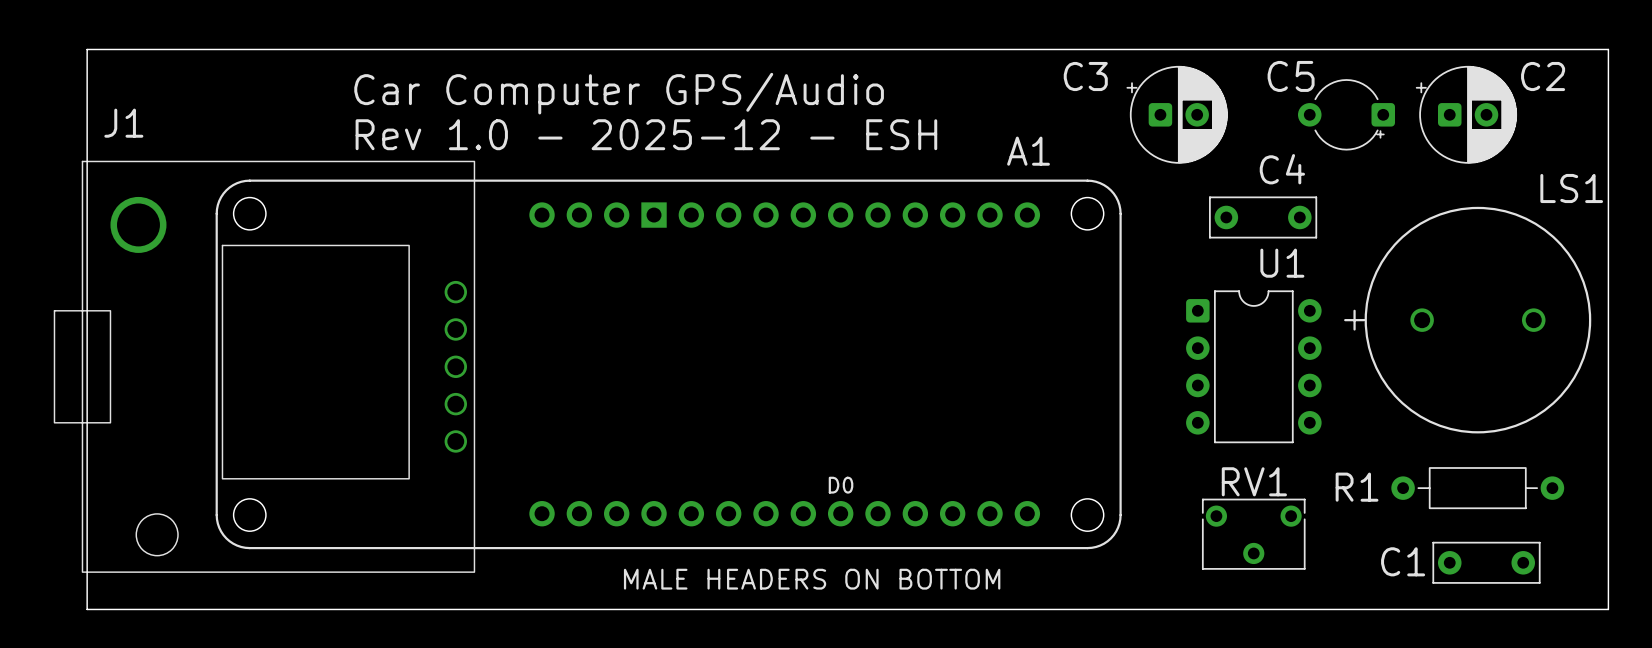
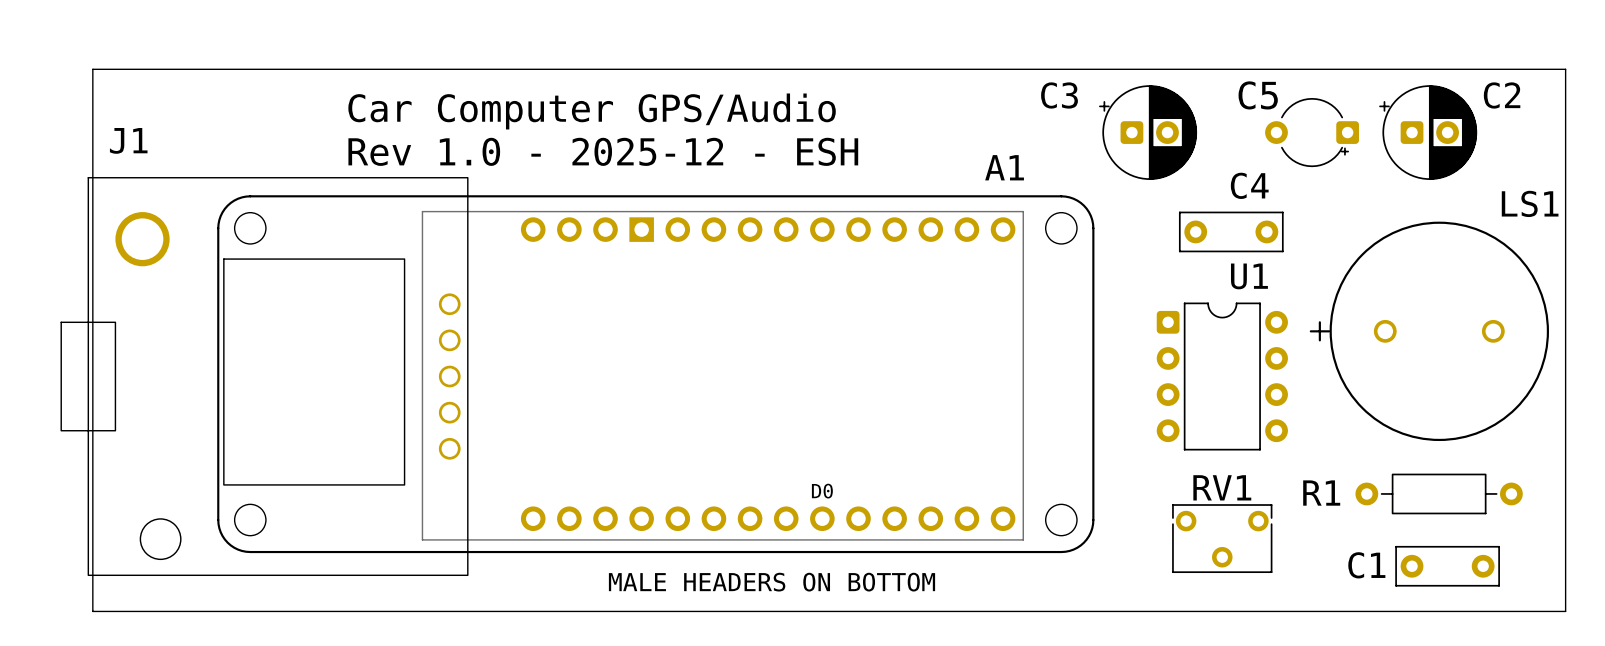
line: none -> (422, 211) (1023, 211) (1023, 539) (422, 539) (422, 211)

